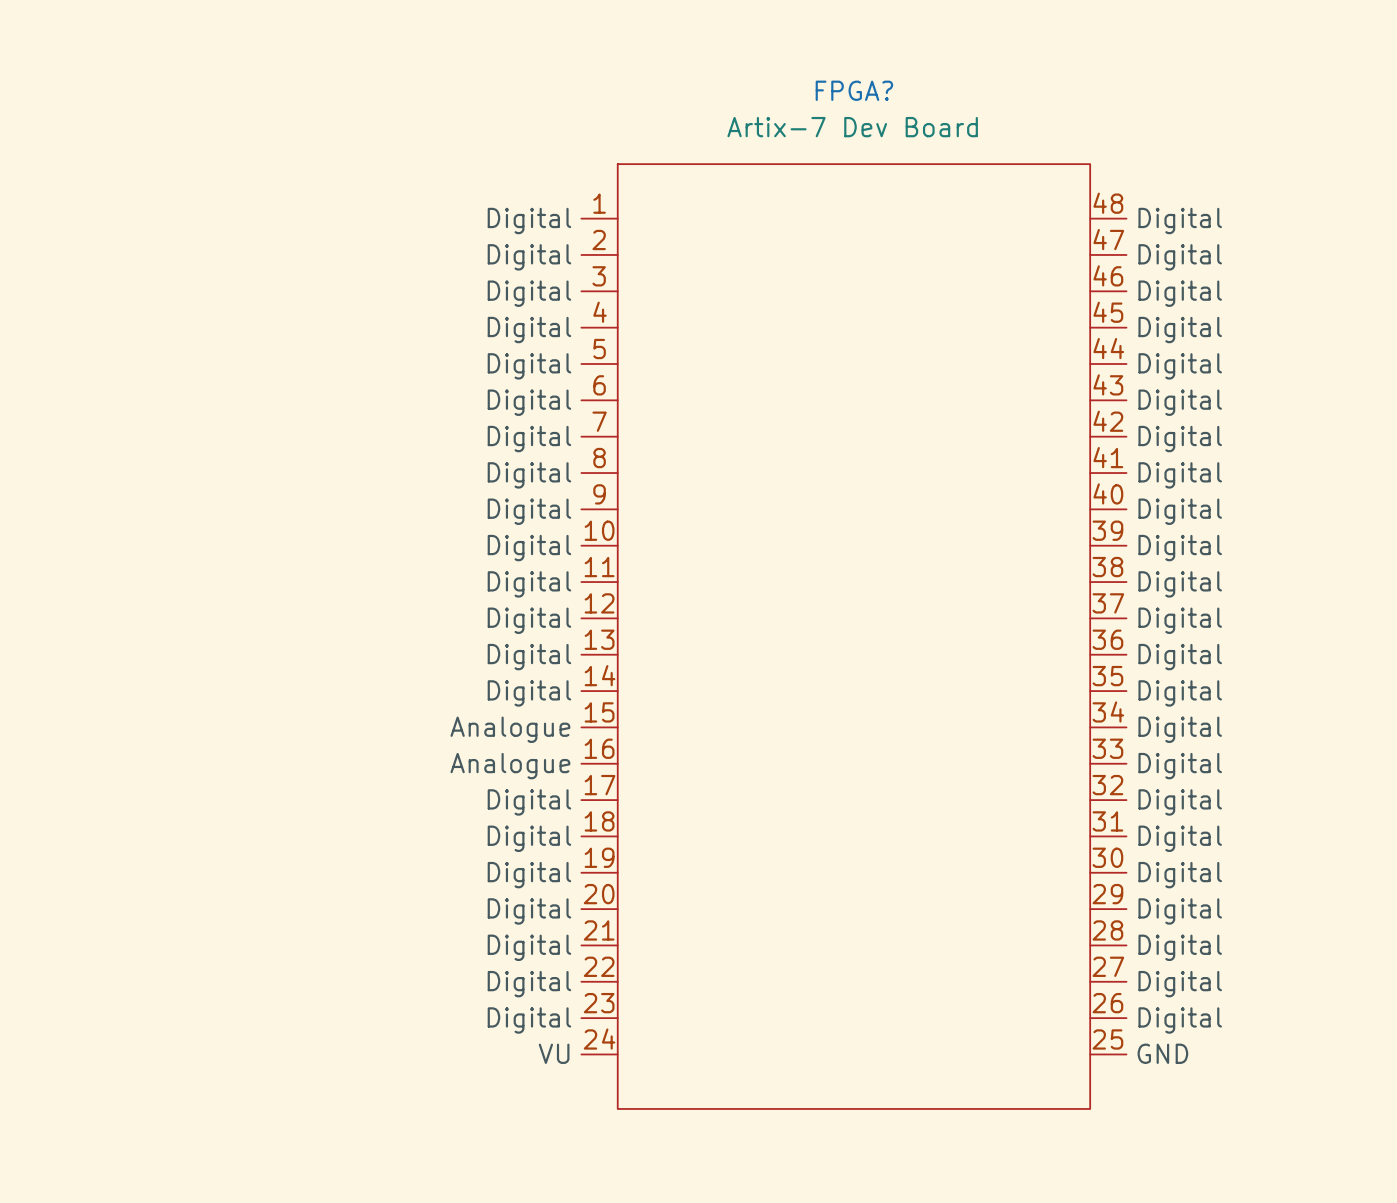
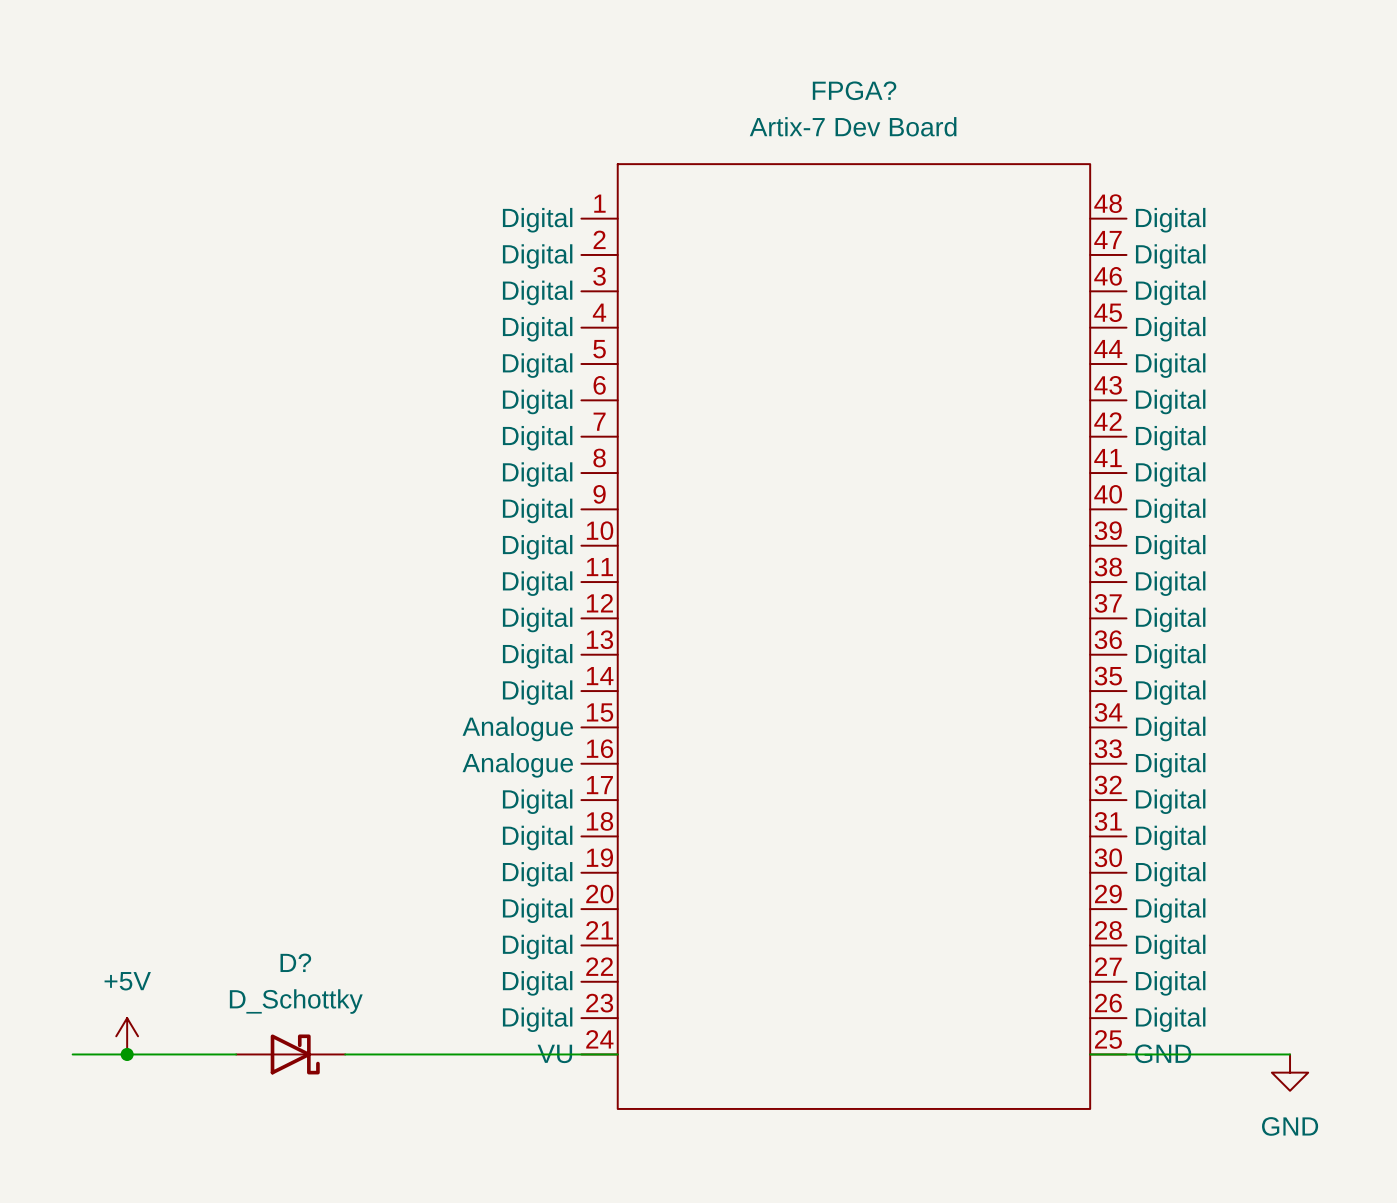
power symbol: none -> +5V (127, 1036)
wire: none -> (72, 1054) (236, 1054)
junction: none -> (127, 1054)
D?: none -> D_Schottky (290, 1054)
wire: none -> (345, 1054) (617, 1054)
wire: none -> (1090, 1054) (1290, 1054)
power symbol: none -> GND (1290, 1072)

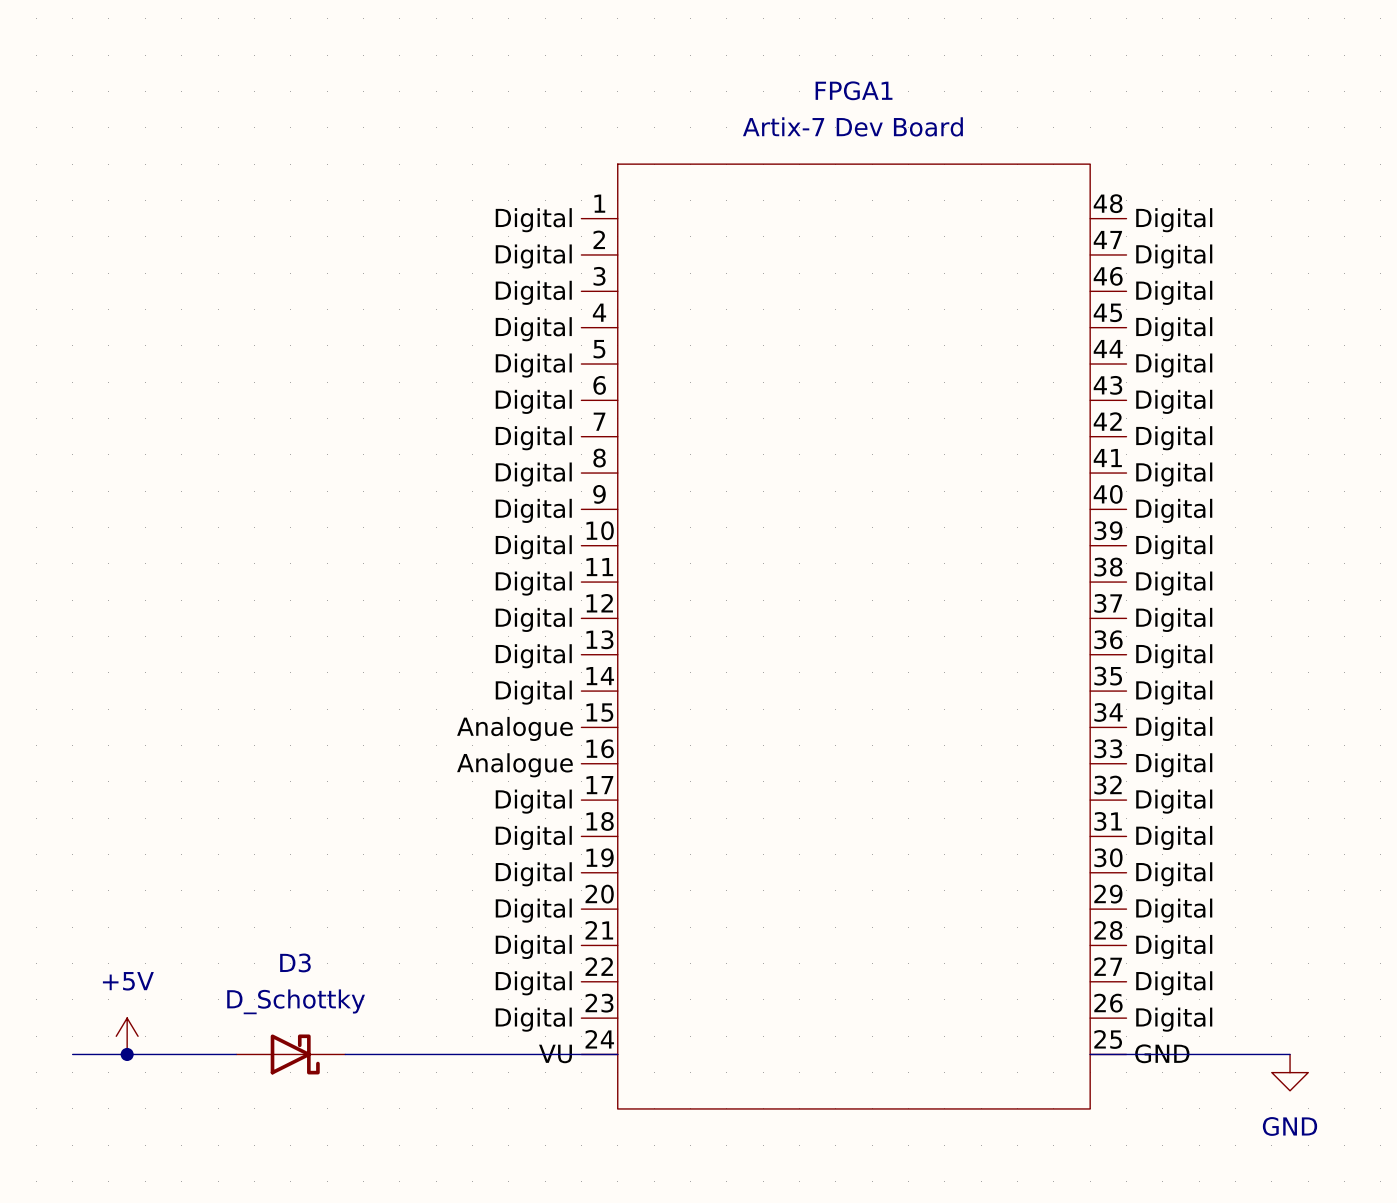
FPGA? name: FPGA? (854, 90) -> FPGA1 (854, 90)
D? name: D? (295, 962) -> D3 (295, 962)

